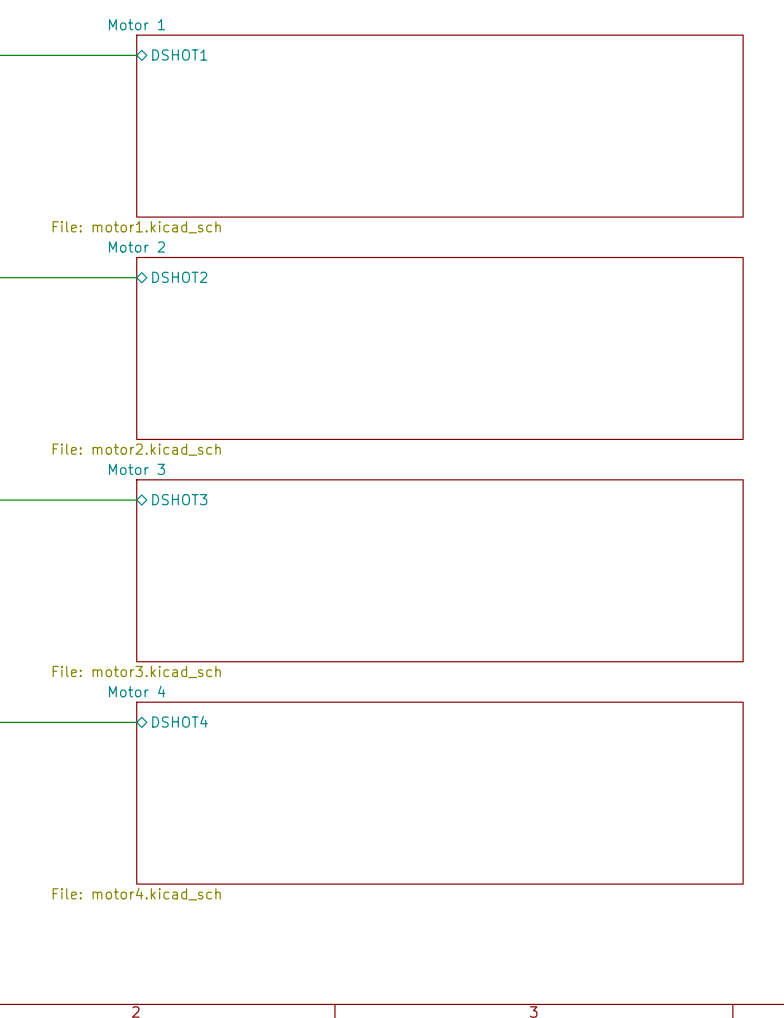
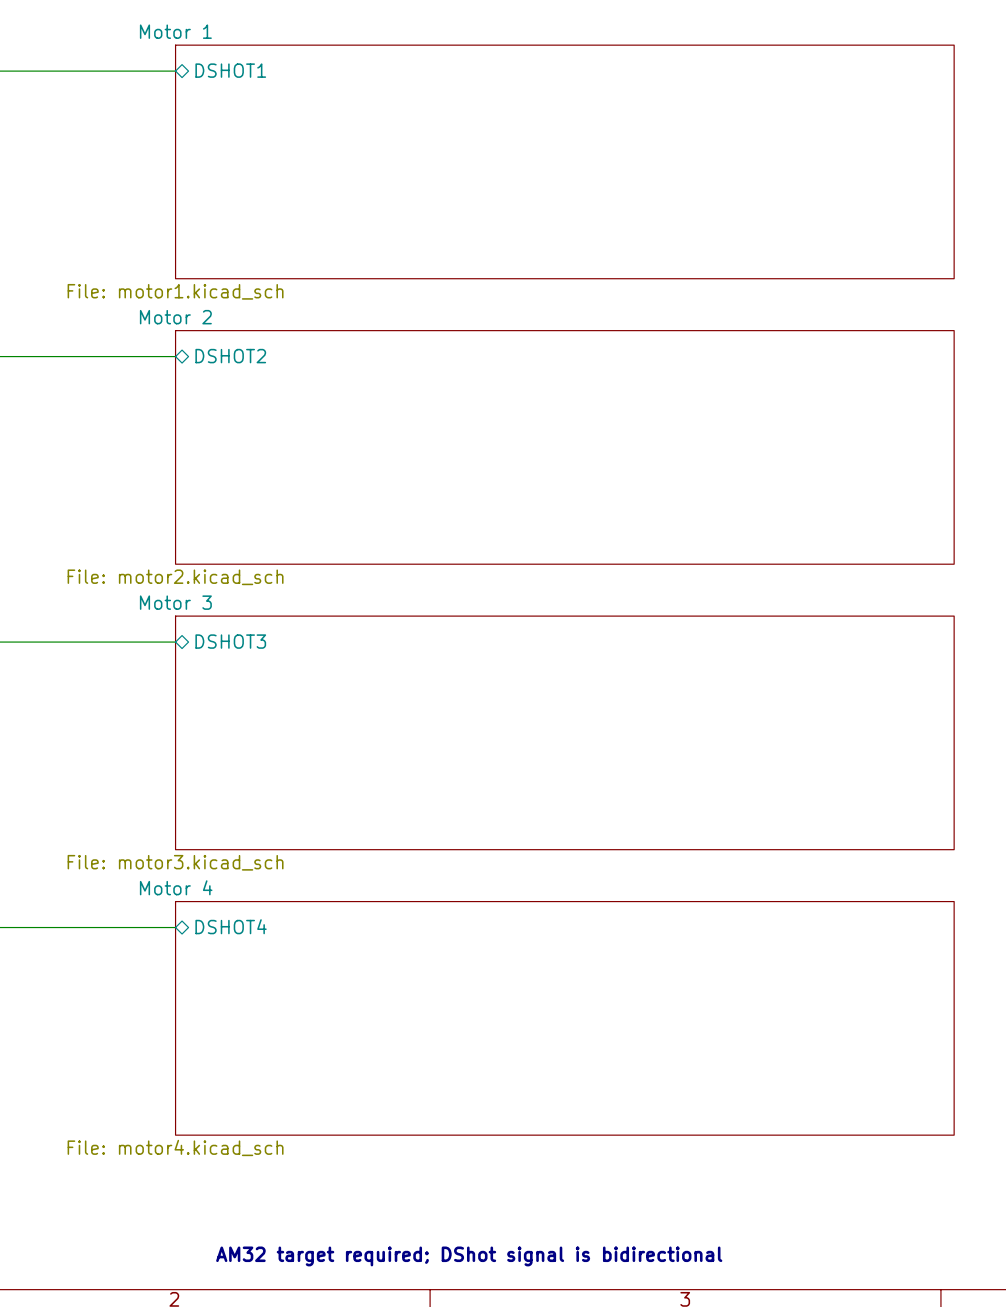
text: none -> AM32 target required; DShot signal is bidirectional (469, 1256)

